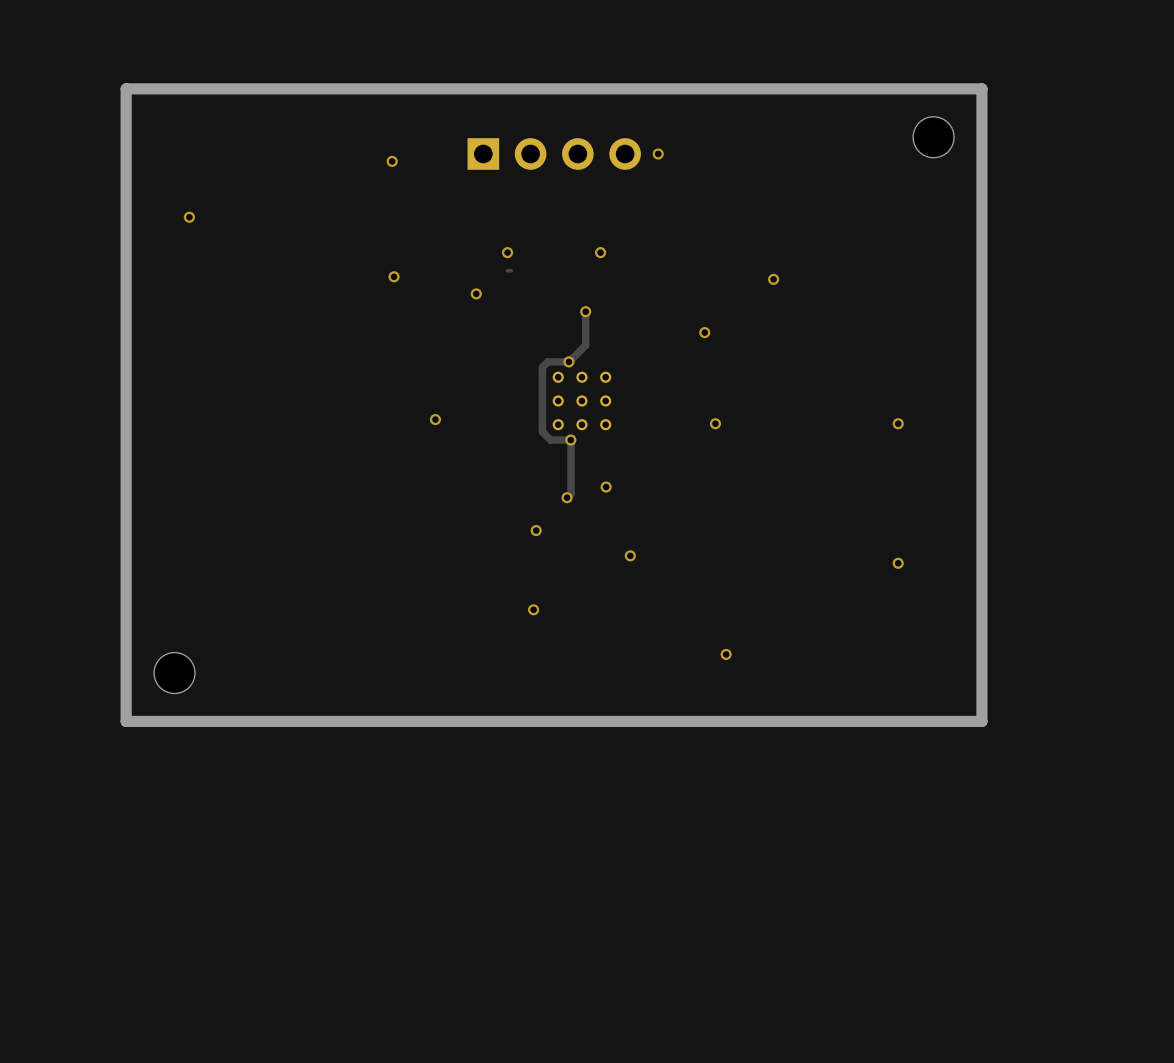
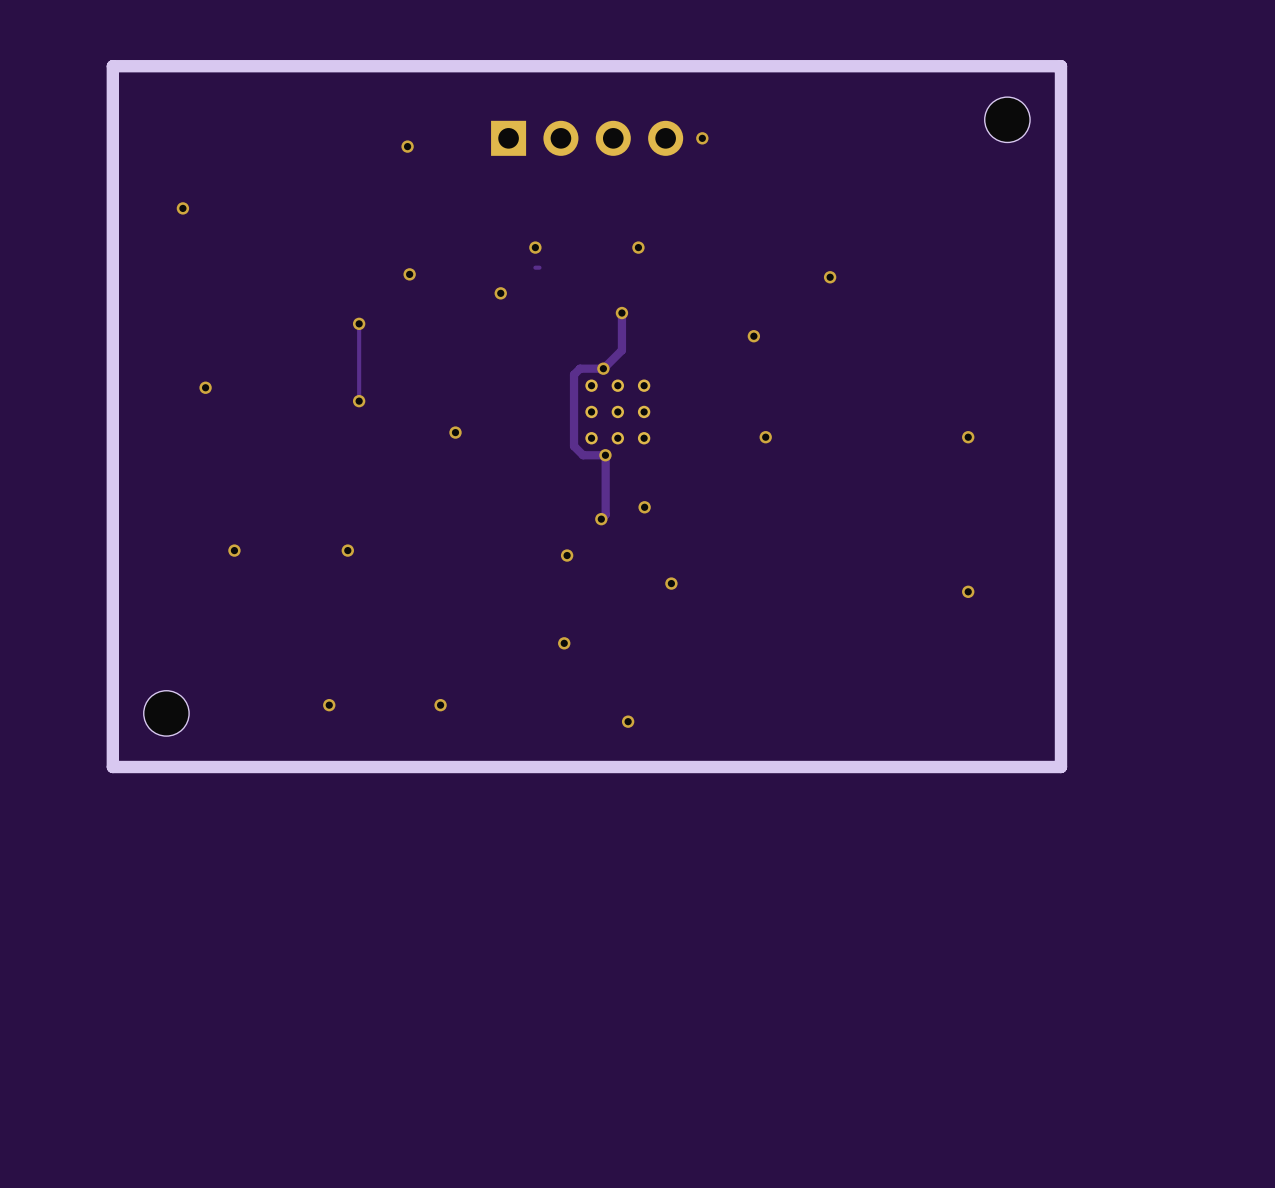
track: none -> (359, 322) (359, 401)
via: none -> (359, 323)
via: none -> (205, 387)
via: none -> (359, 401)
via: none -> (234, 550)
via: none -> (347, 550)
via: (726, 654) -> none
via: none -> (329, 705)
via: none -> (440, 705)
via: none -> (628, 721)

